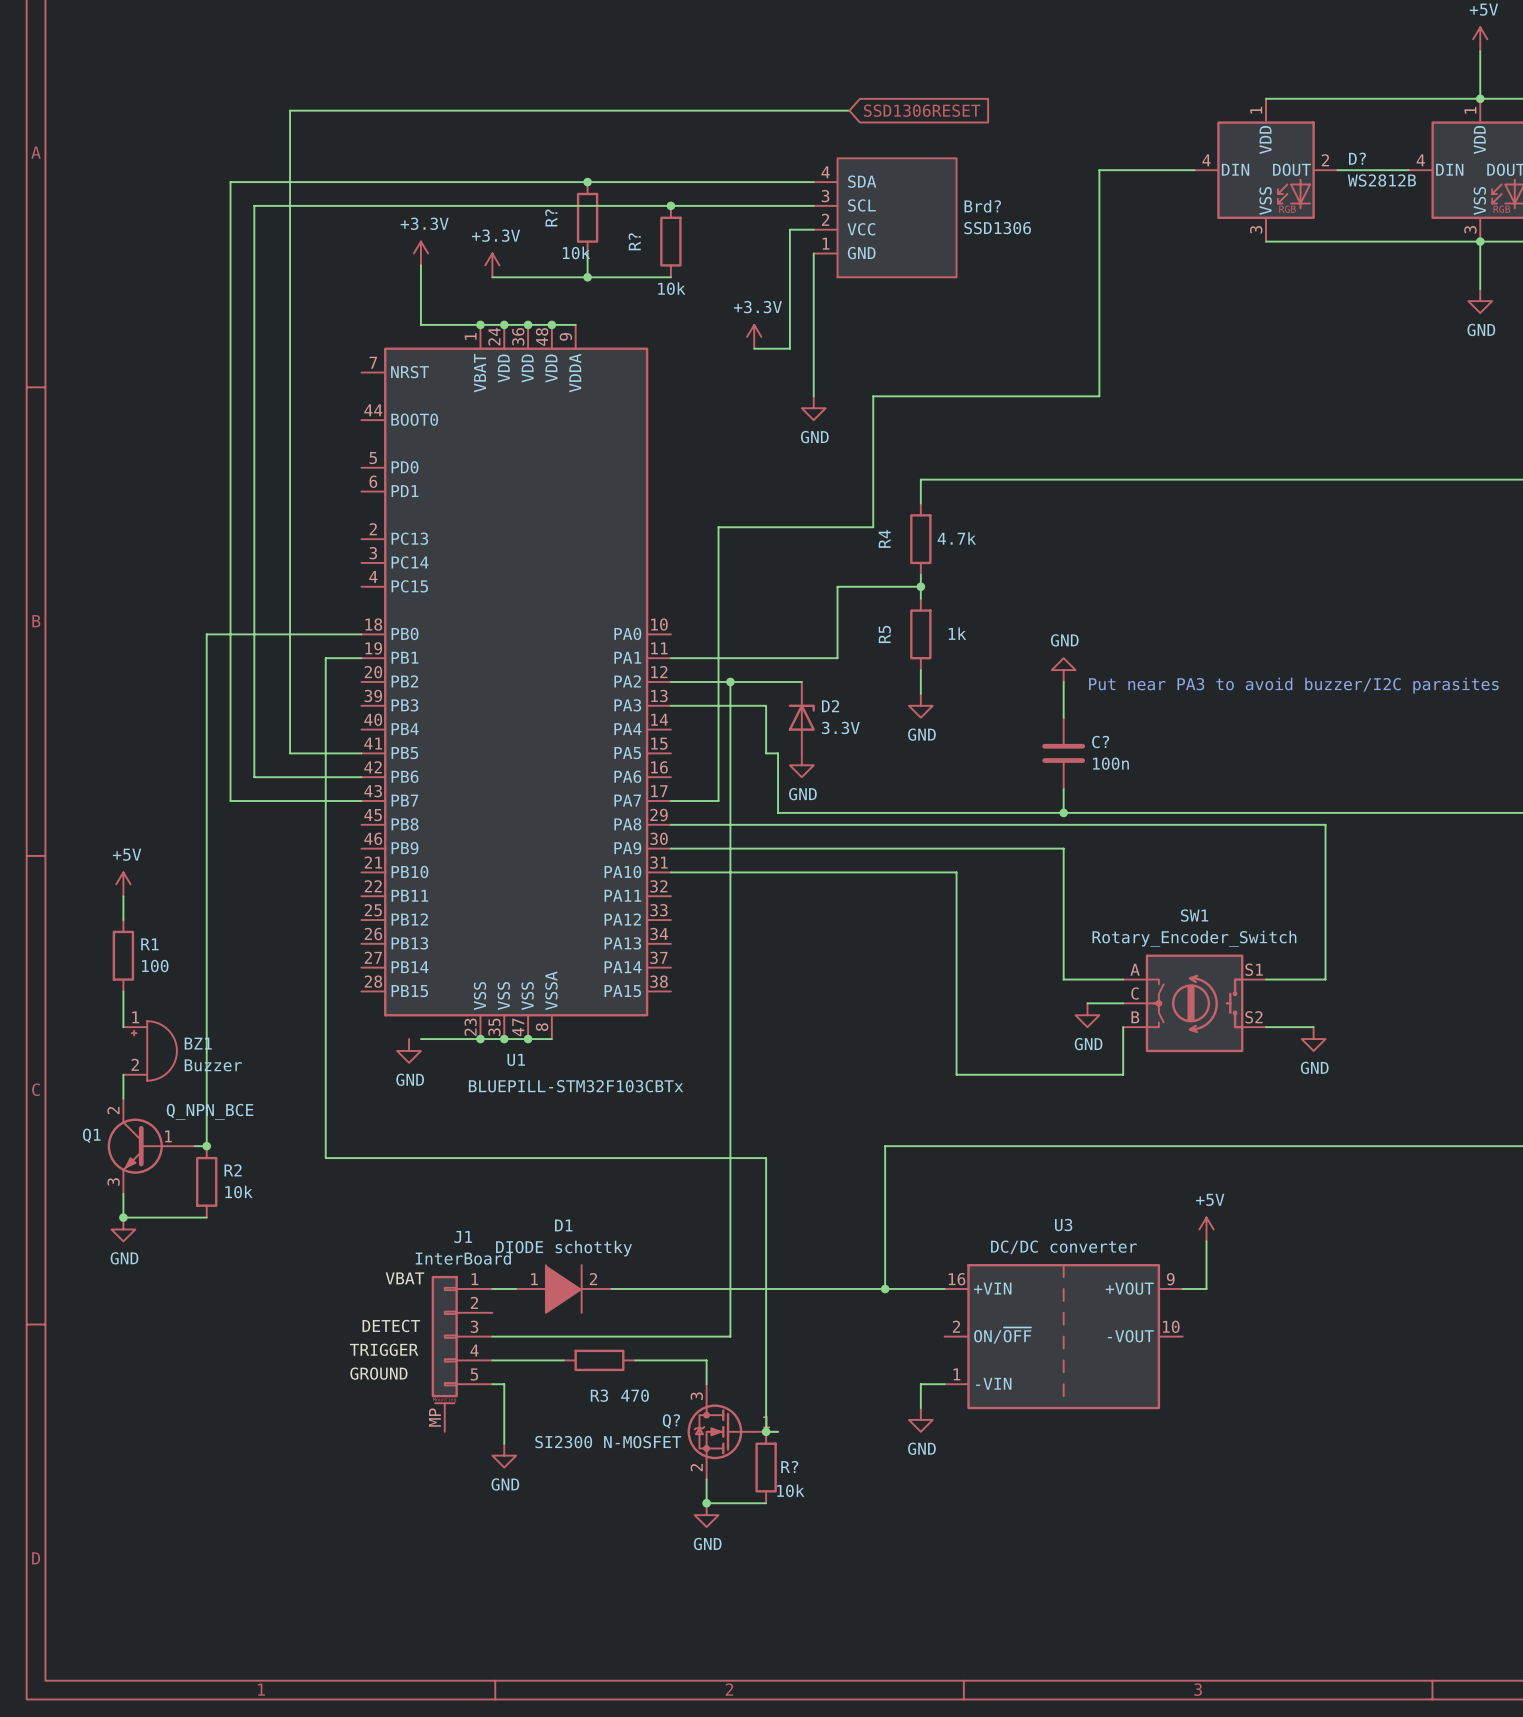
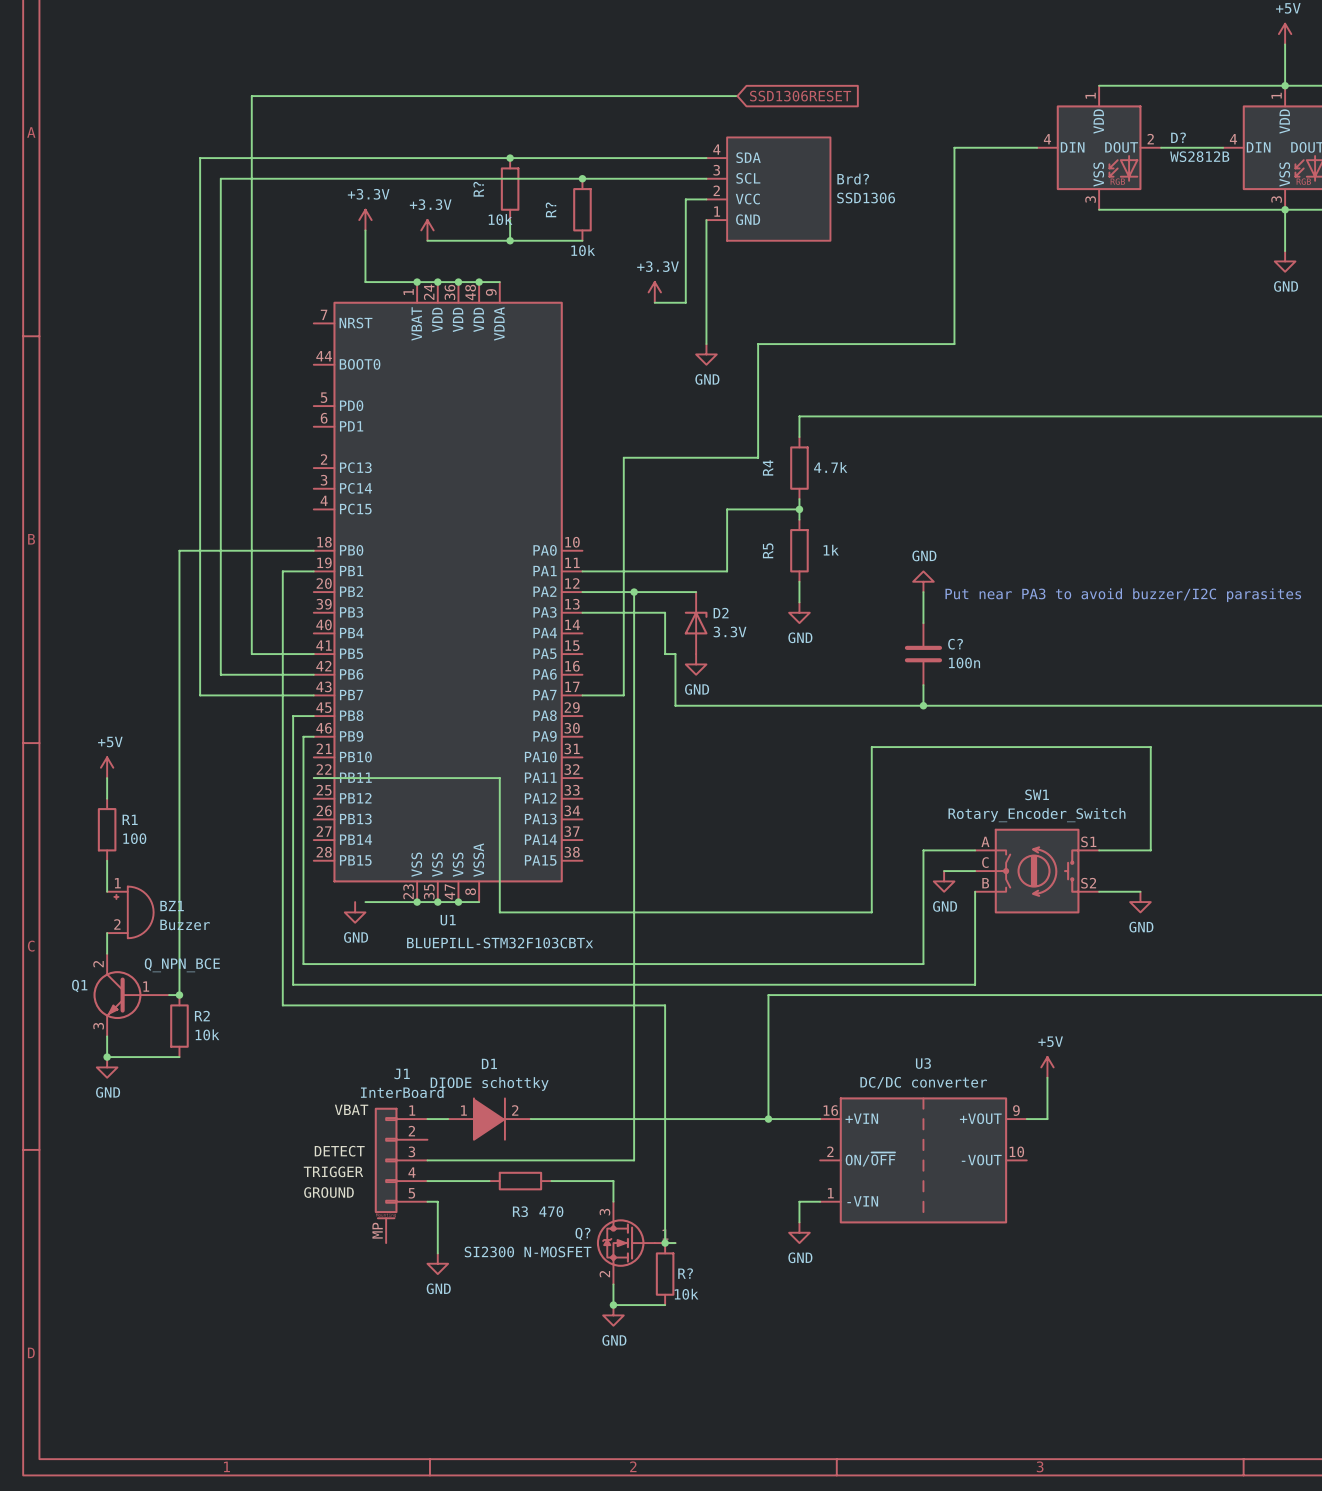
wire: (670, 824) (1325, 824) (1325, 860) -> (313, 778) (499, 778) (499, 912) (871, 912) (871, 747) (1150, 747)
wire: (670, 848) (1063, 848) (1063, 979) -> (313, 736) (303, 736) (303, 964) (923, 964) (923, 850)
wire: (670, 872) (956, 872) (956, 1074) (1123, 1074) -> (313, 716) (293, 716) (293, 984) (975, 984) (975, 933)

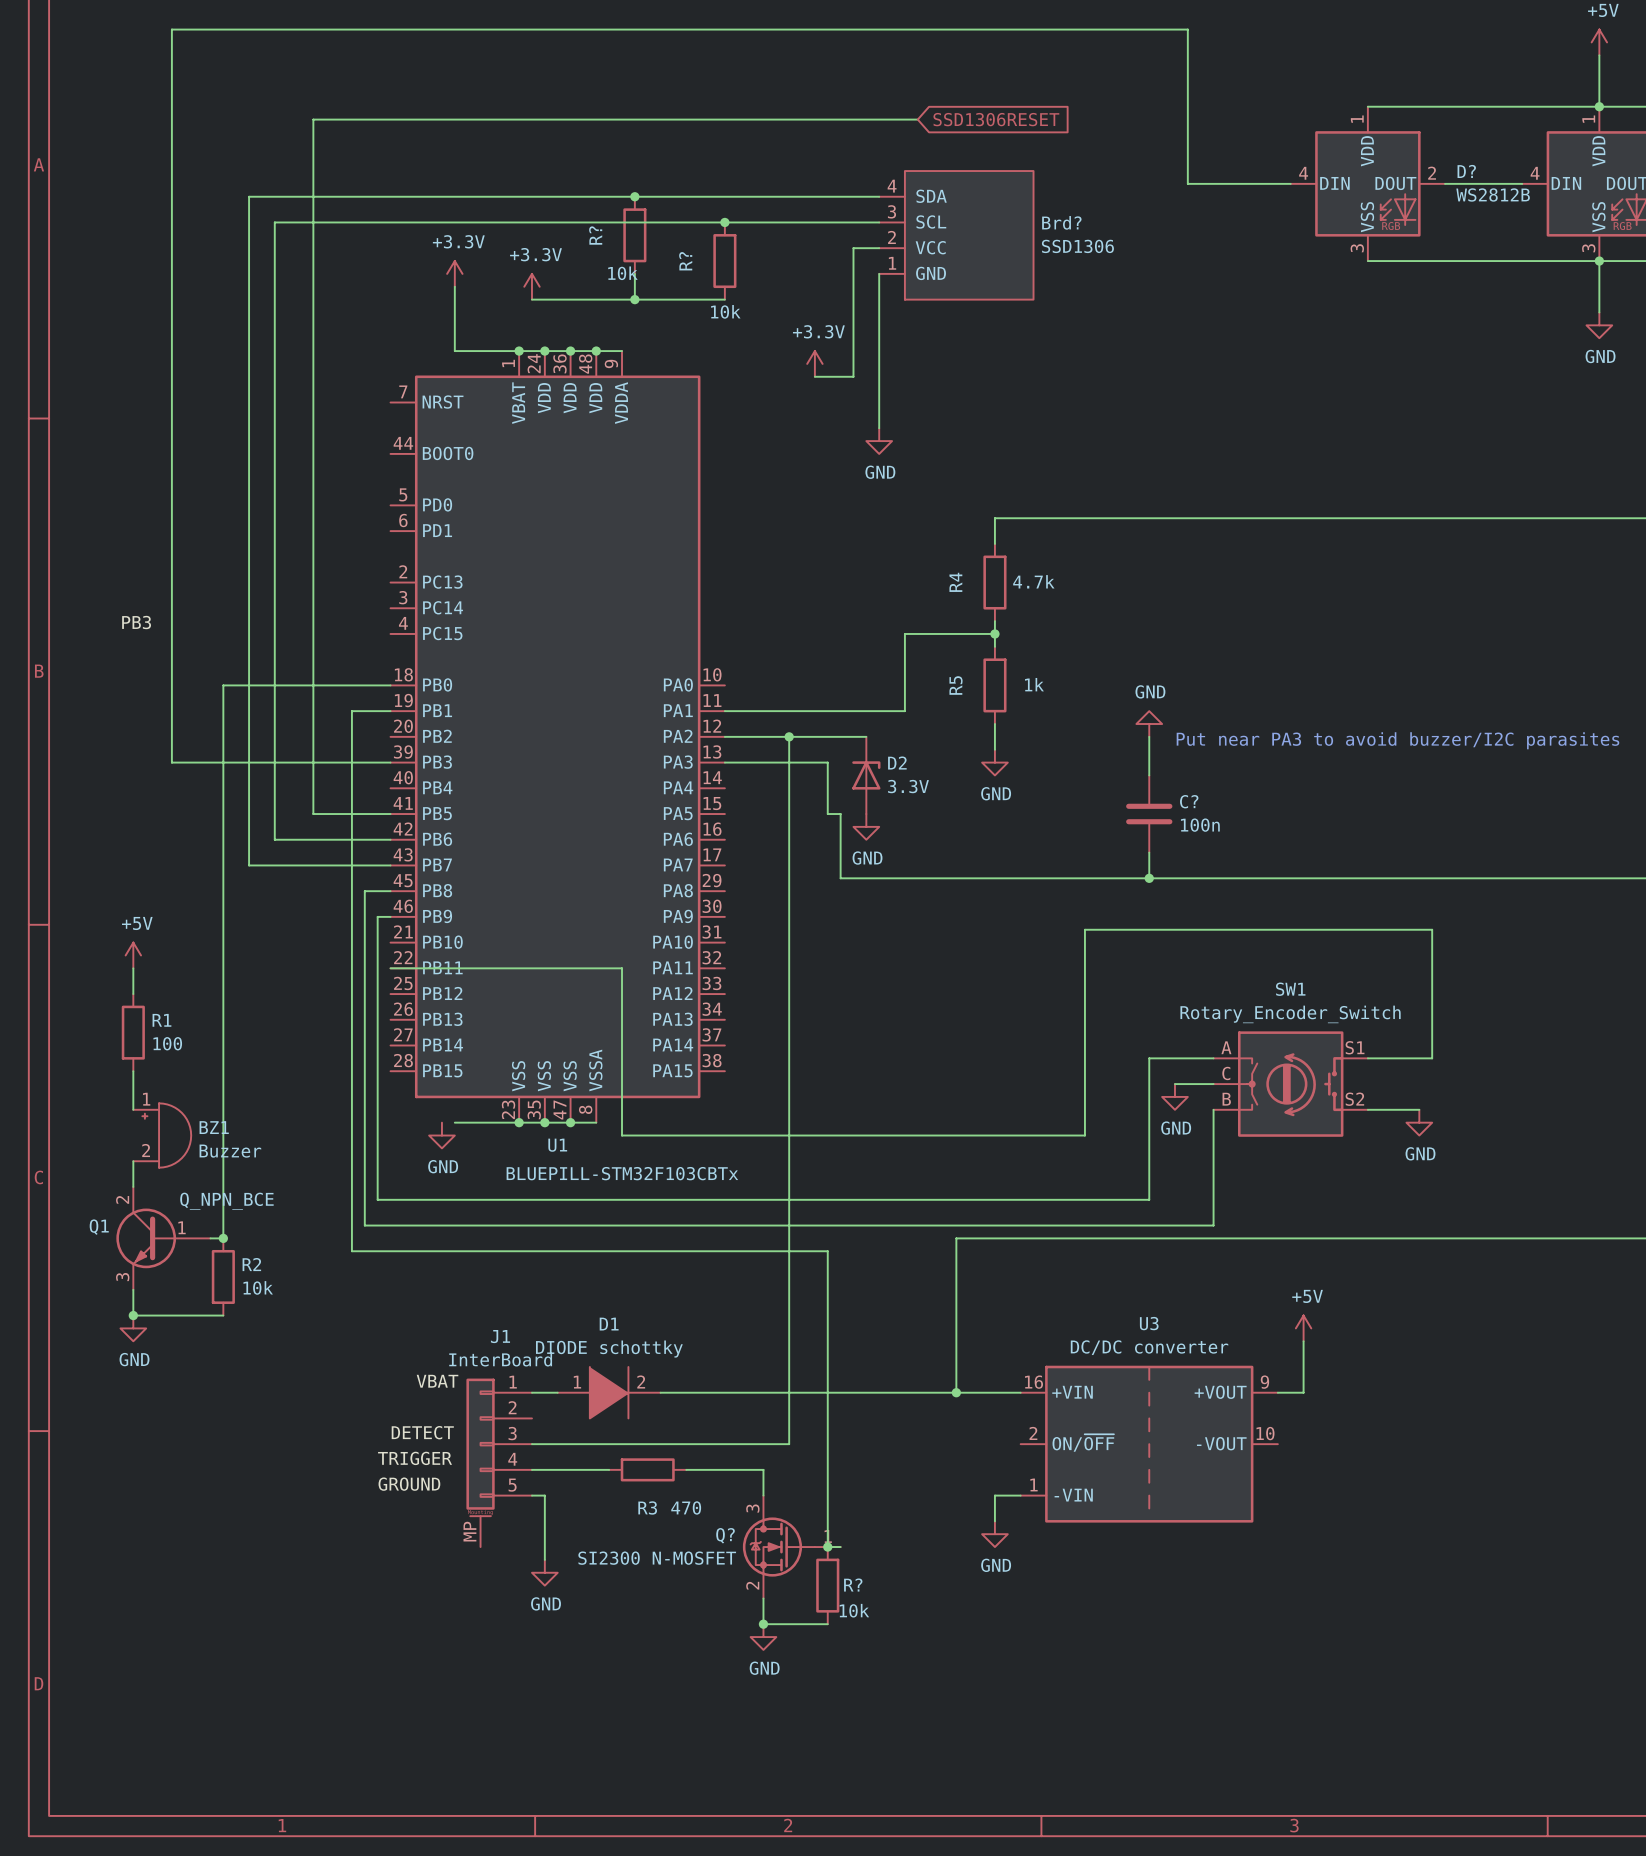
wire: (954, 147) (954, 344) (758, 344) (758, 457) (623, 457) (623, 695) (582, 695) -> (1187, 183) (1187, 29) (171, 29) (171, 762) (390, 762)
label: none -> PB3 (136, 622)

